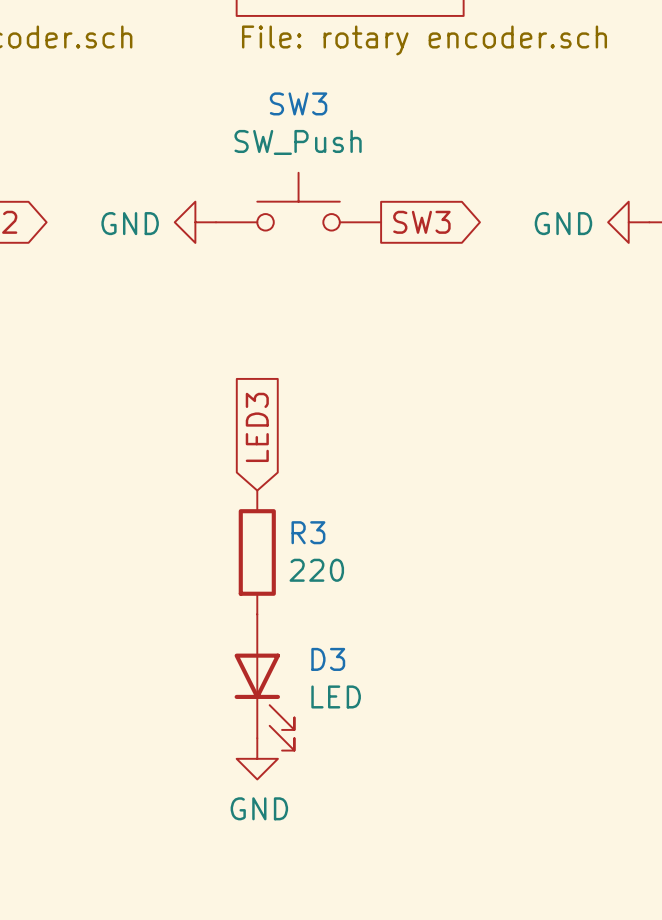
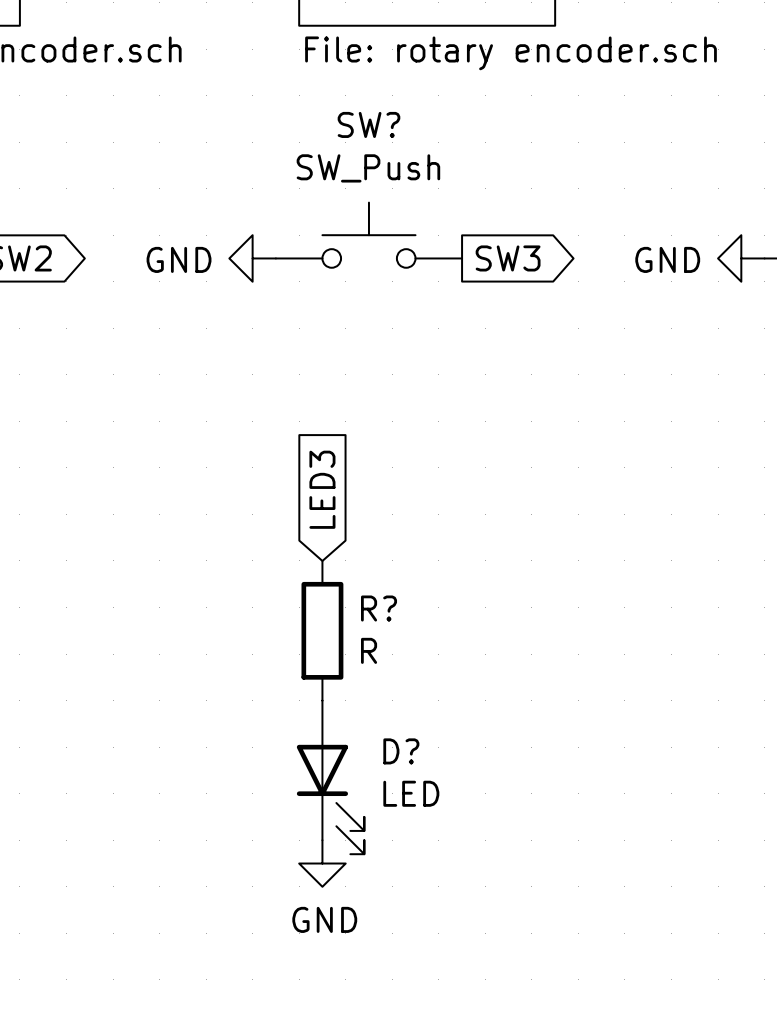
SW3 name: SW3 (298, 103) -> SW? (368, 124)
R3 name: R3 (308, 532) -> R? (379, 608)
R3 value: 220 (316, 570) -> R (369, 650)
D3 name: D3 (328, 659) -> D? (401, 751)

